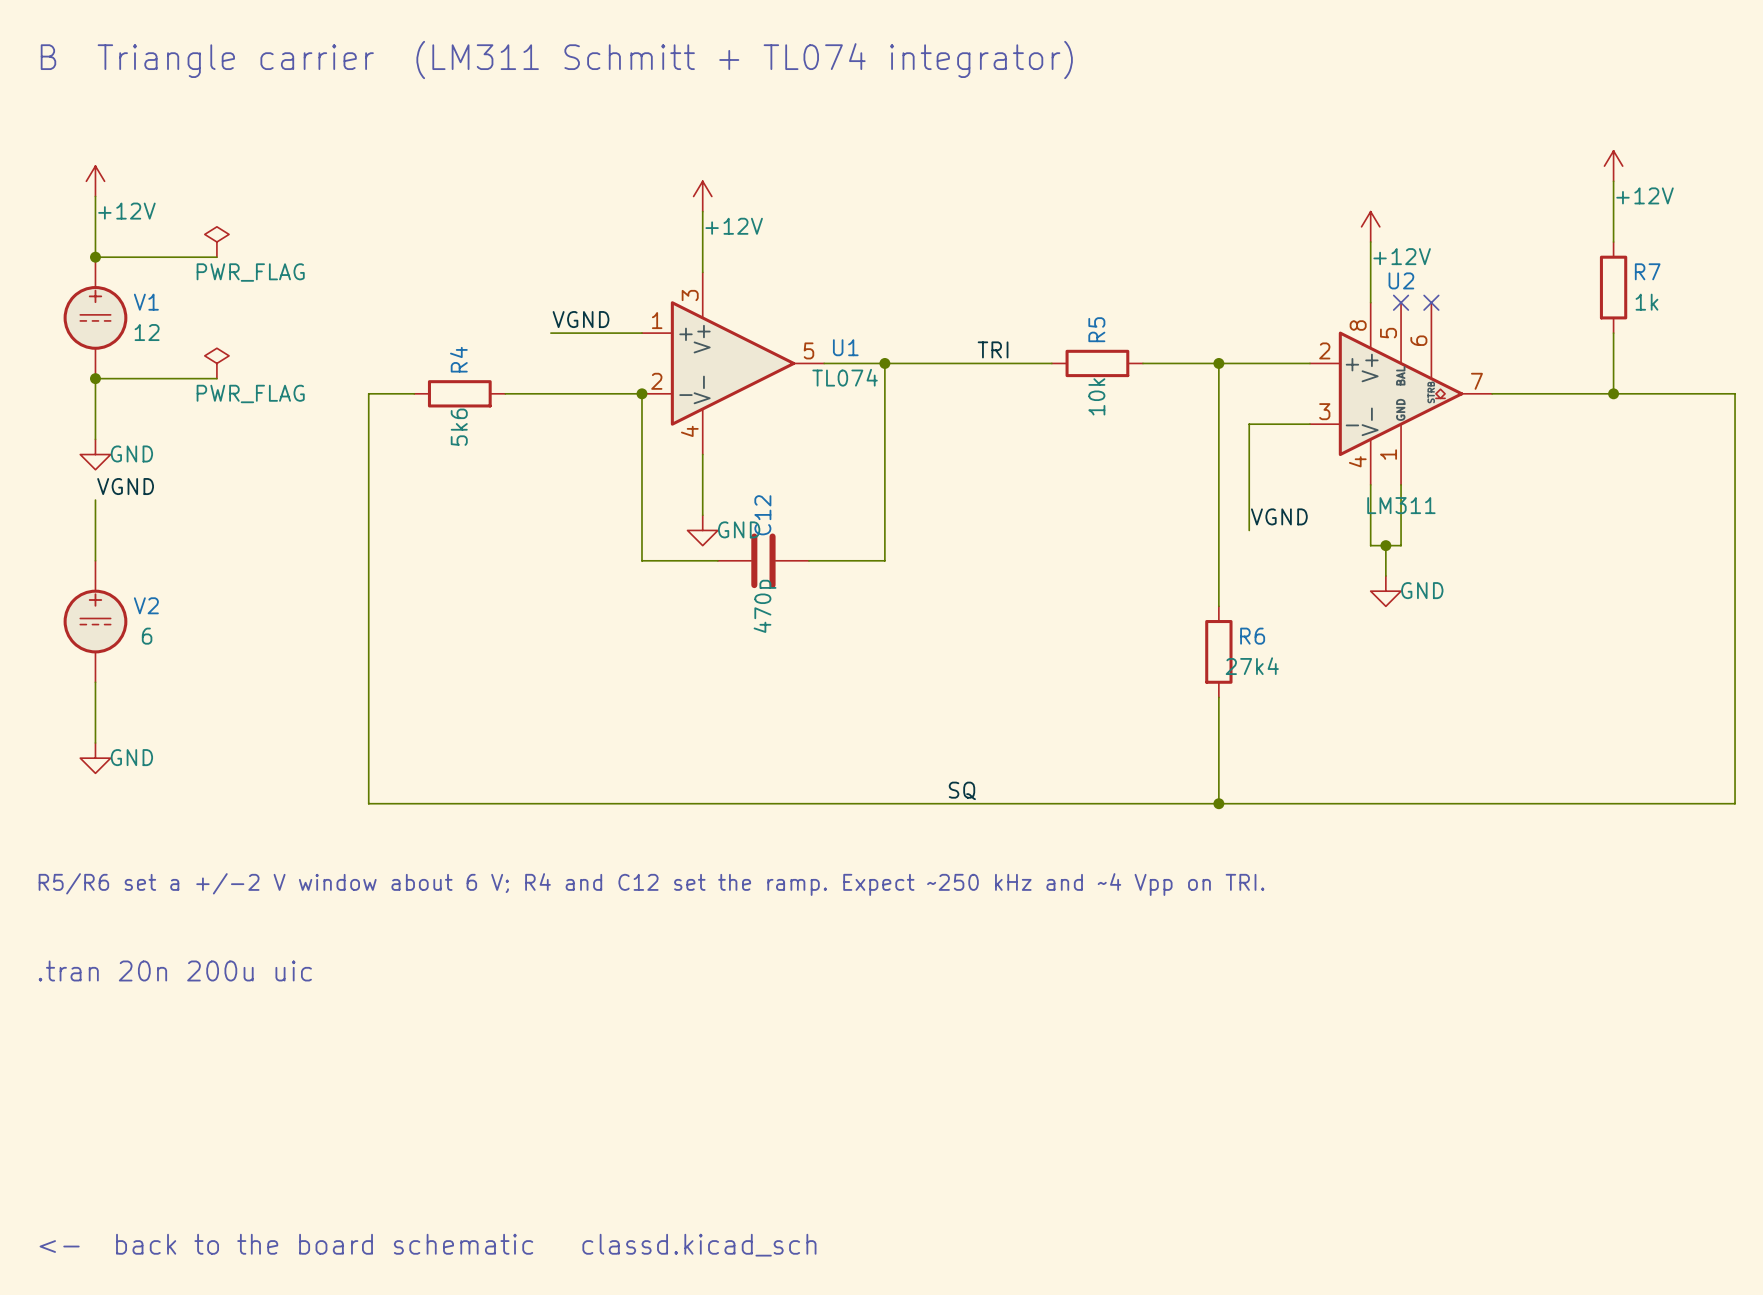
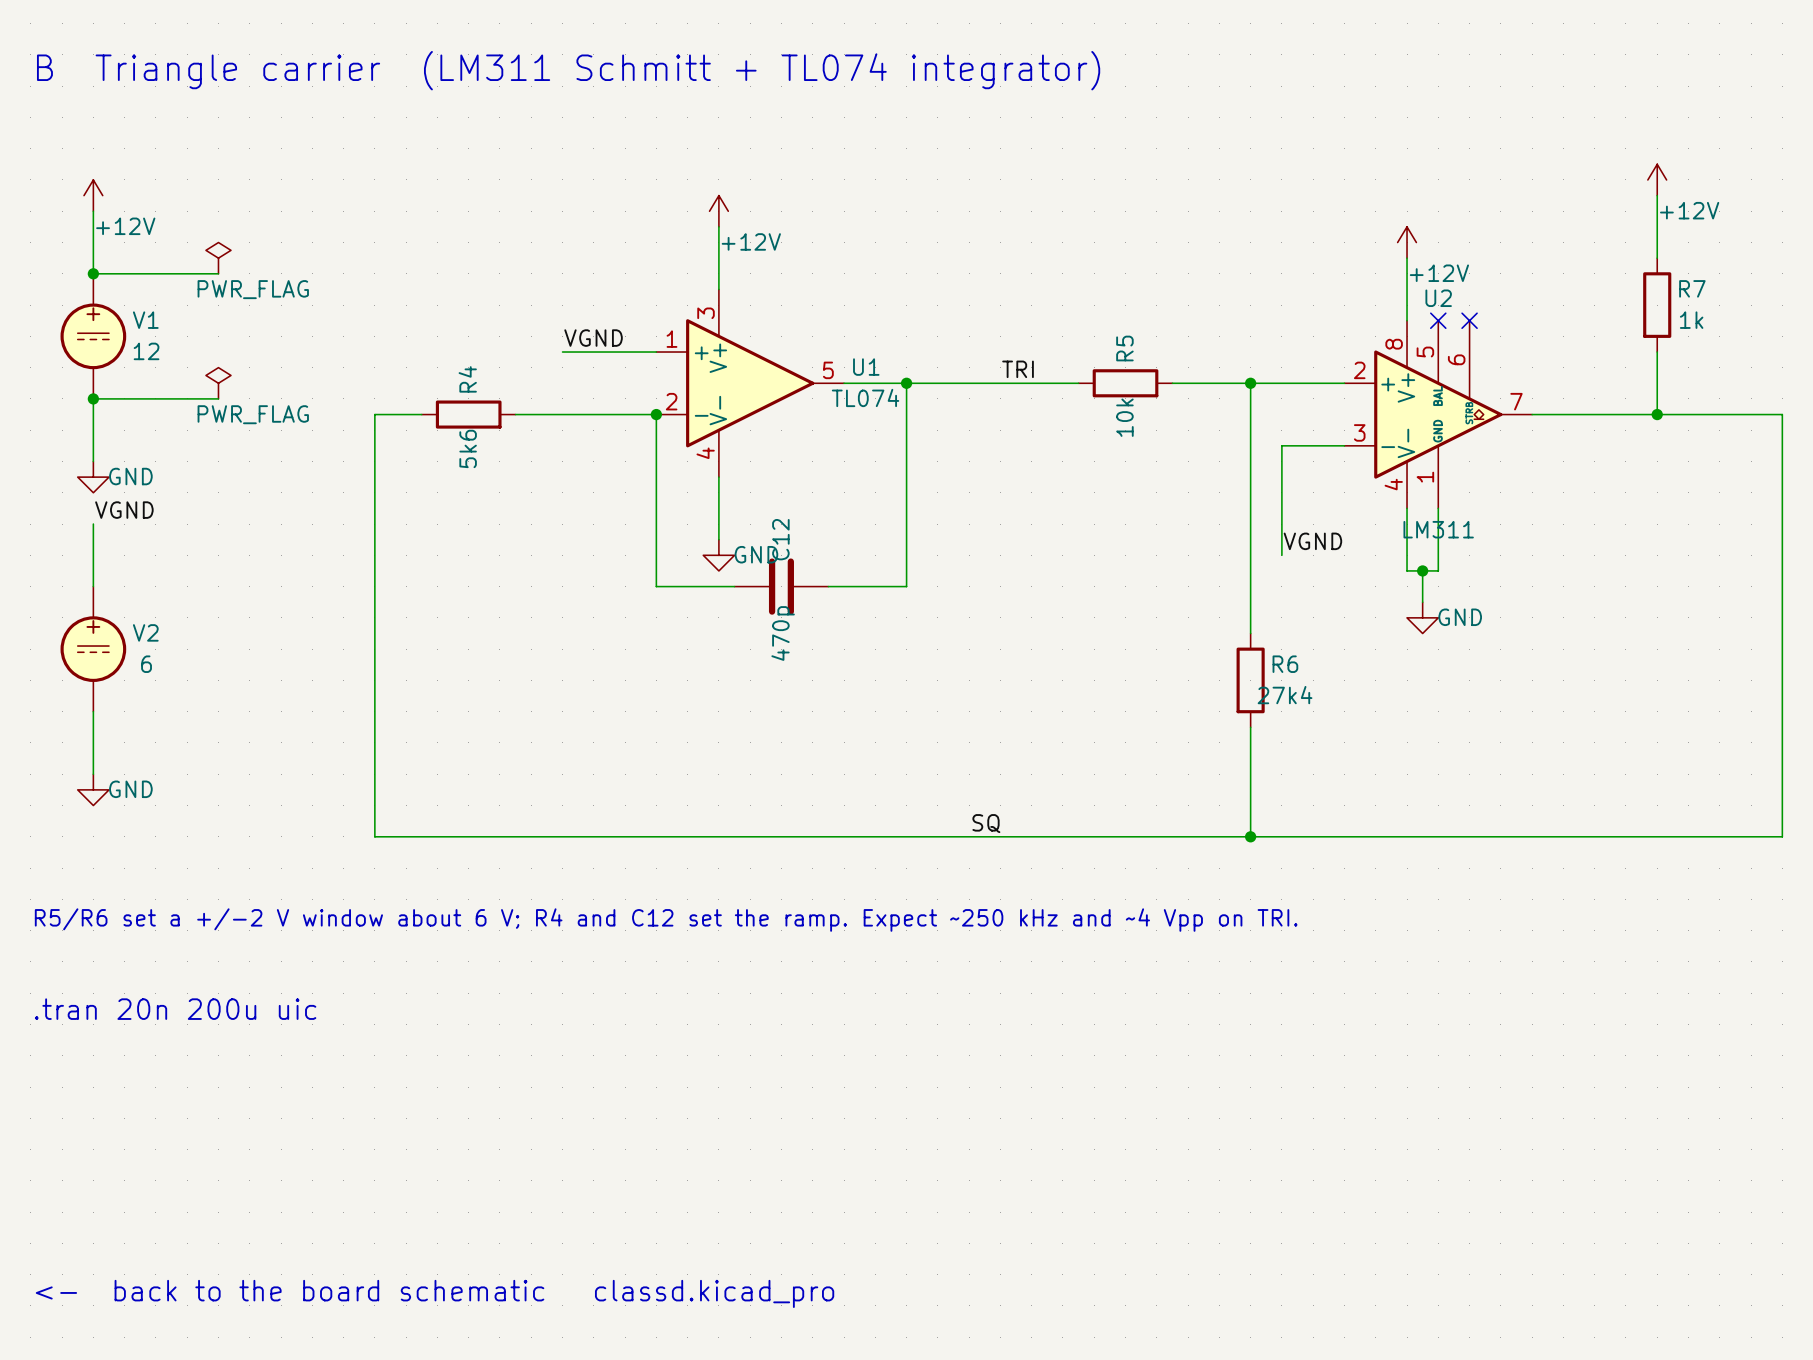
text: <- back to the board schematic classd.kicad_sch (428, 1245) -> <- back to the board schematic classd.kicad_pro (435, 1293)

